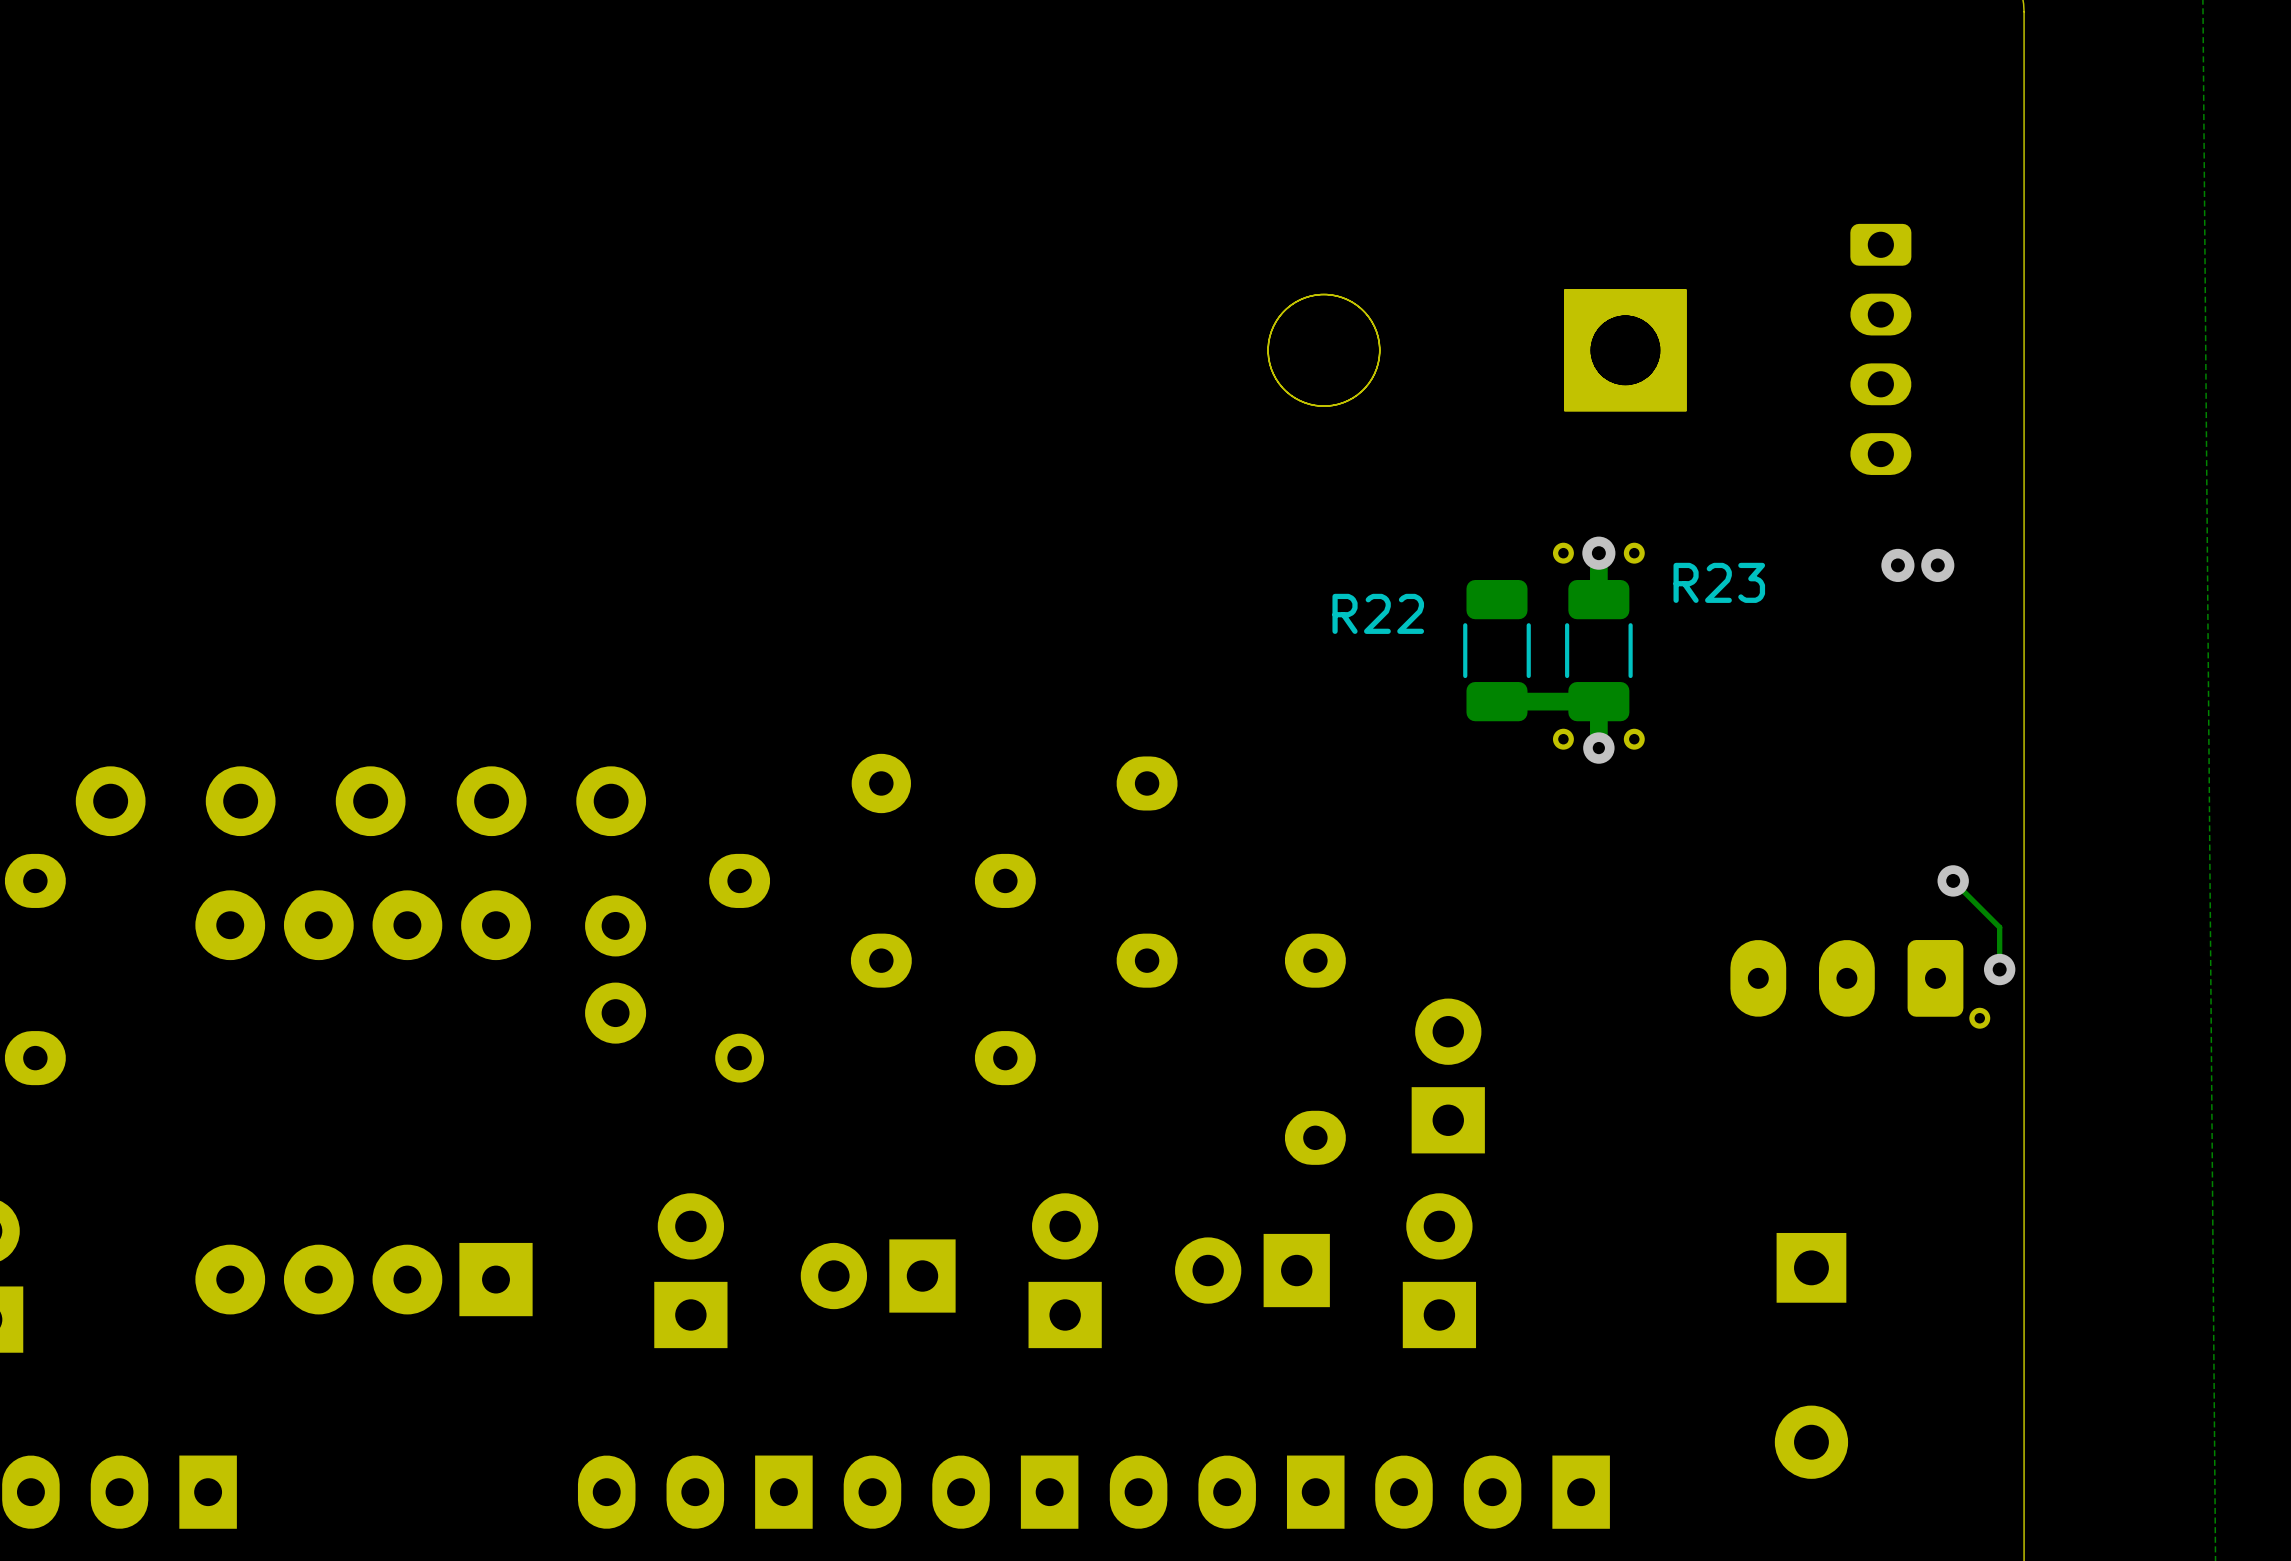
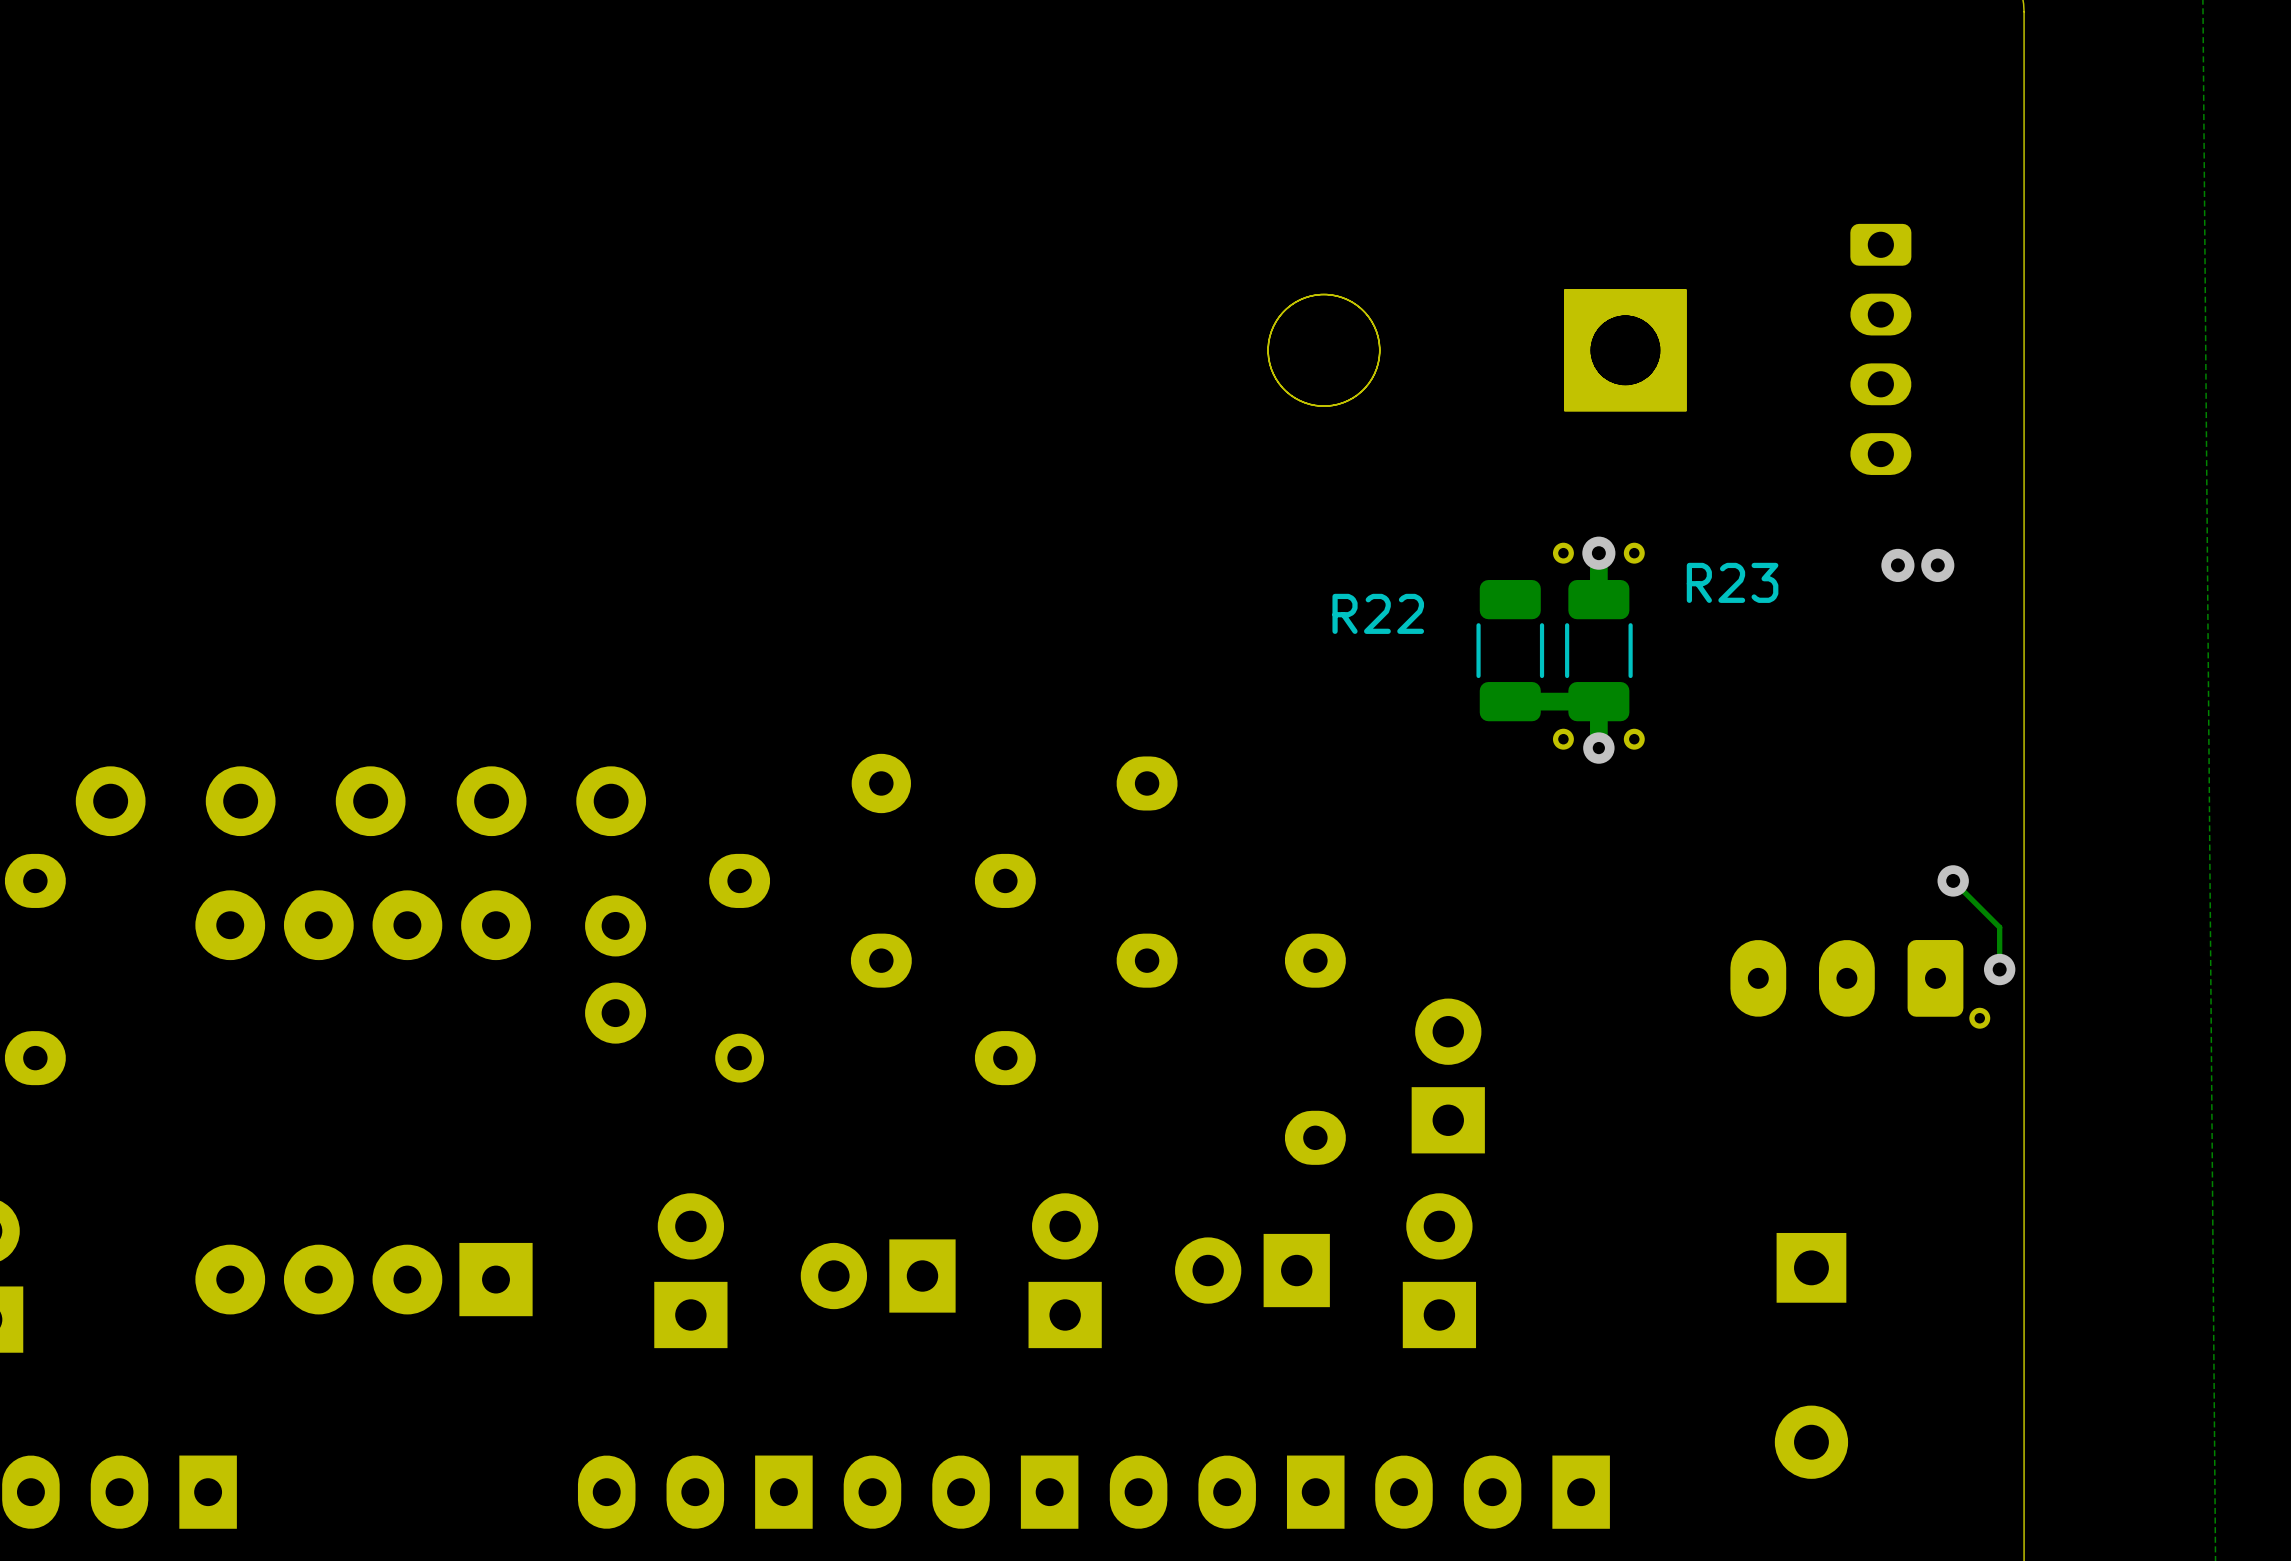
R23 position: (1496, 650) -> (1510, 650)

